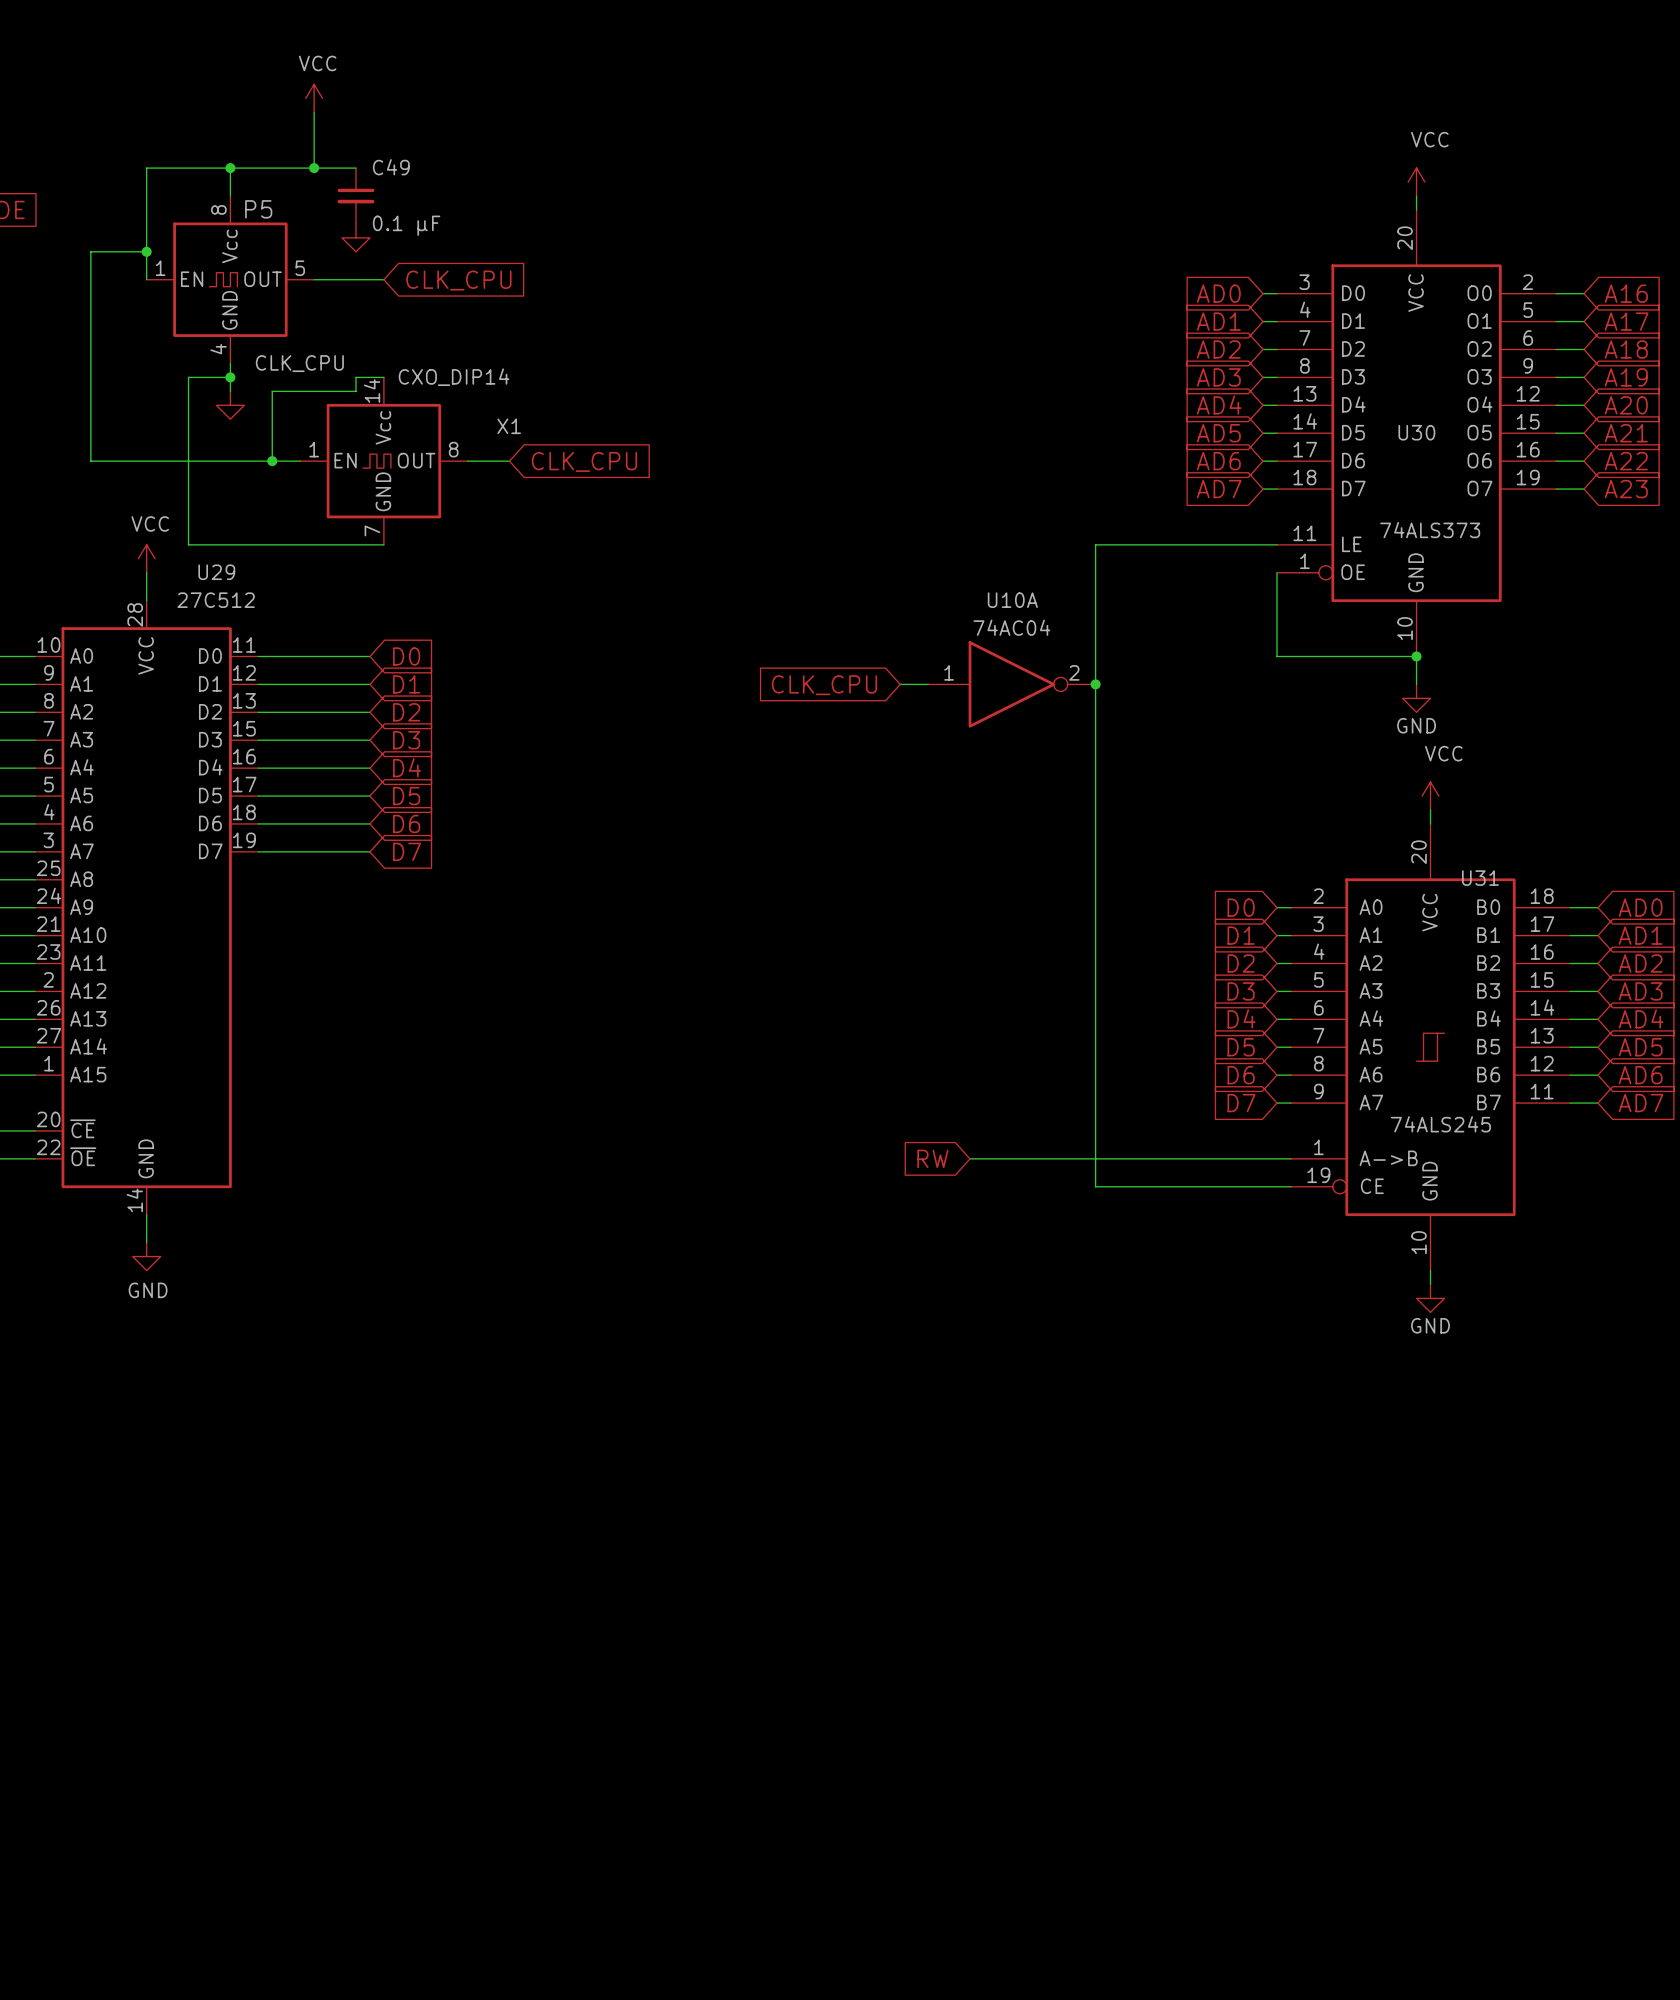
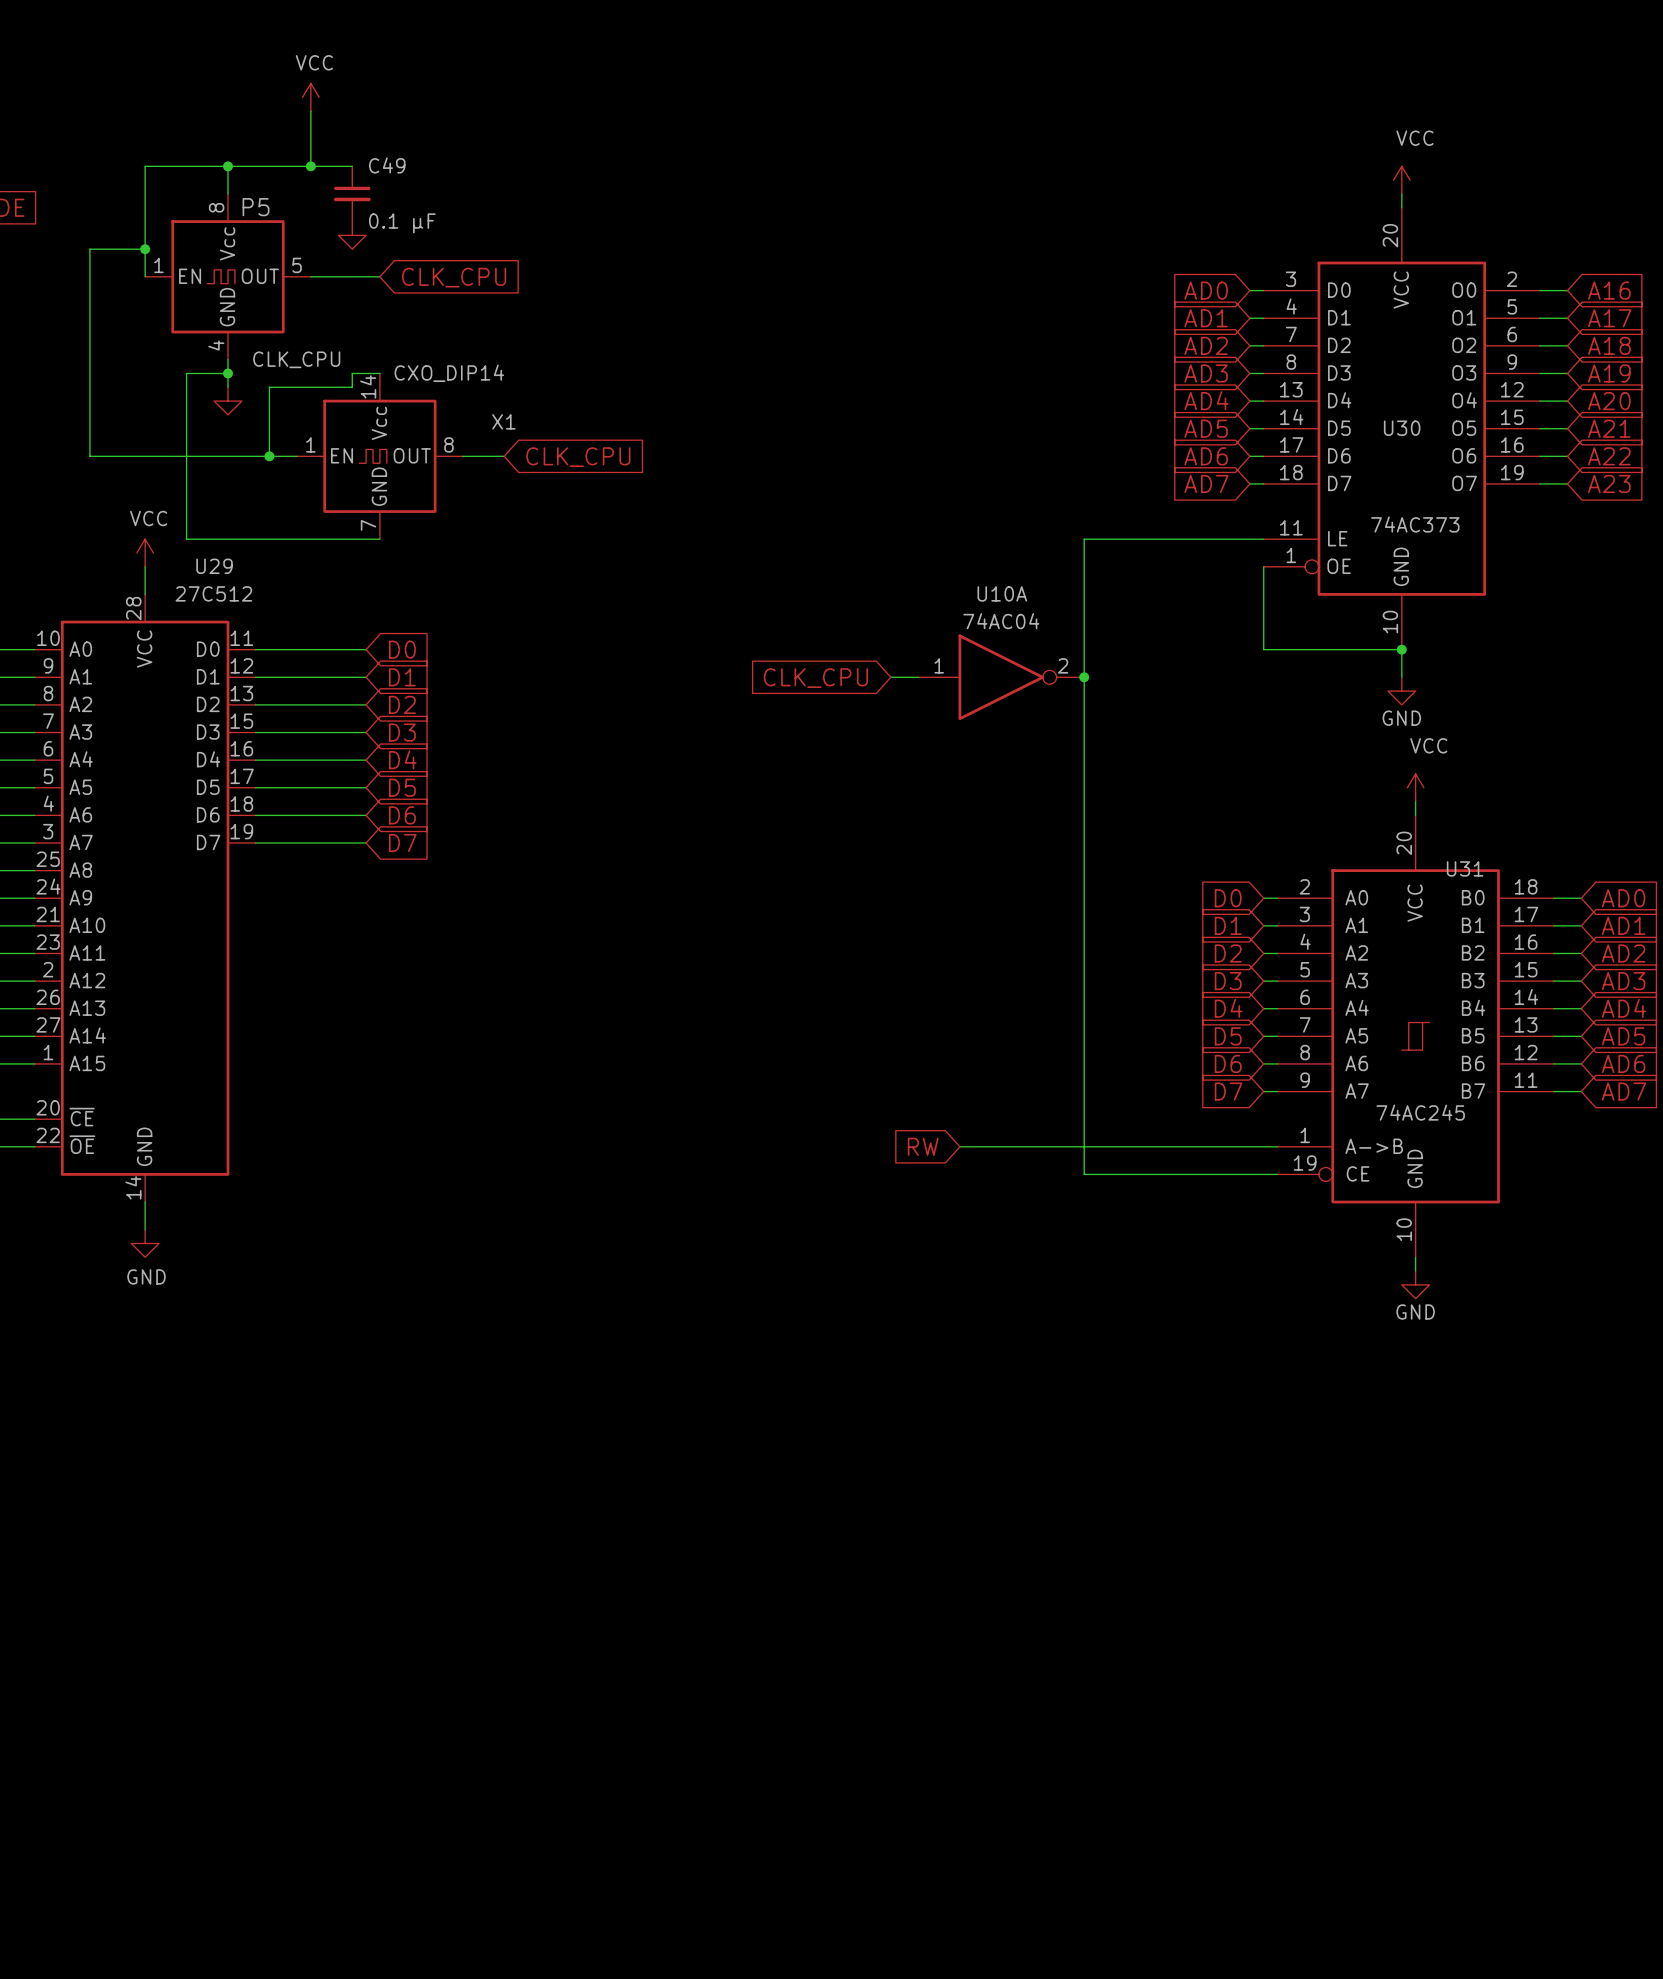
U30 value: 74ALS373 (1430, 530) -> 74AC373 (1415, 524)
U31 value: 74ALS245 (1440, 1124) -> 74AC245 (1420, 1112)

